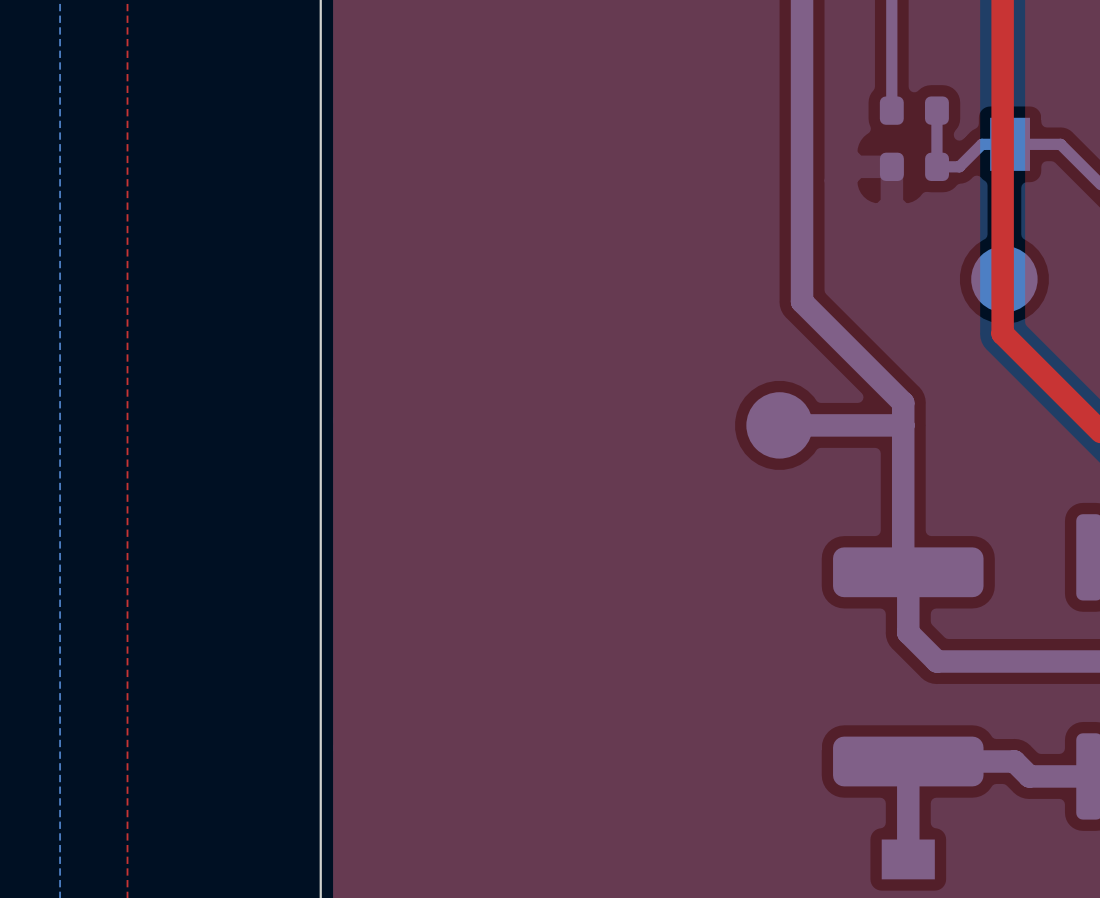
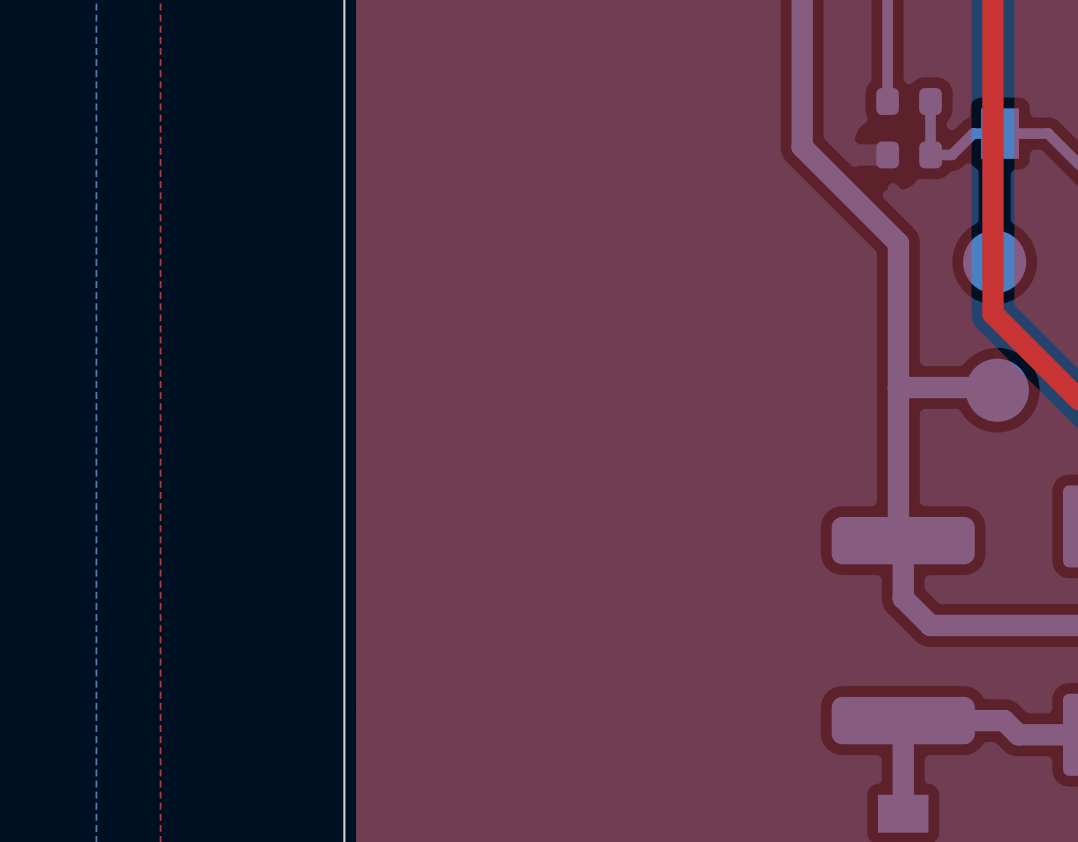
bottom track: (802, 158) (802, 301) (903, 402) -> (802, 146) (898, 243) (898, 379)
bottom track: none -> (898, 387) (994, 387) (997, 390)
bottom track: (779, 425) (903, 425) -> none
part position: (779, 425) -> (997, 390)

